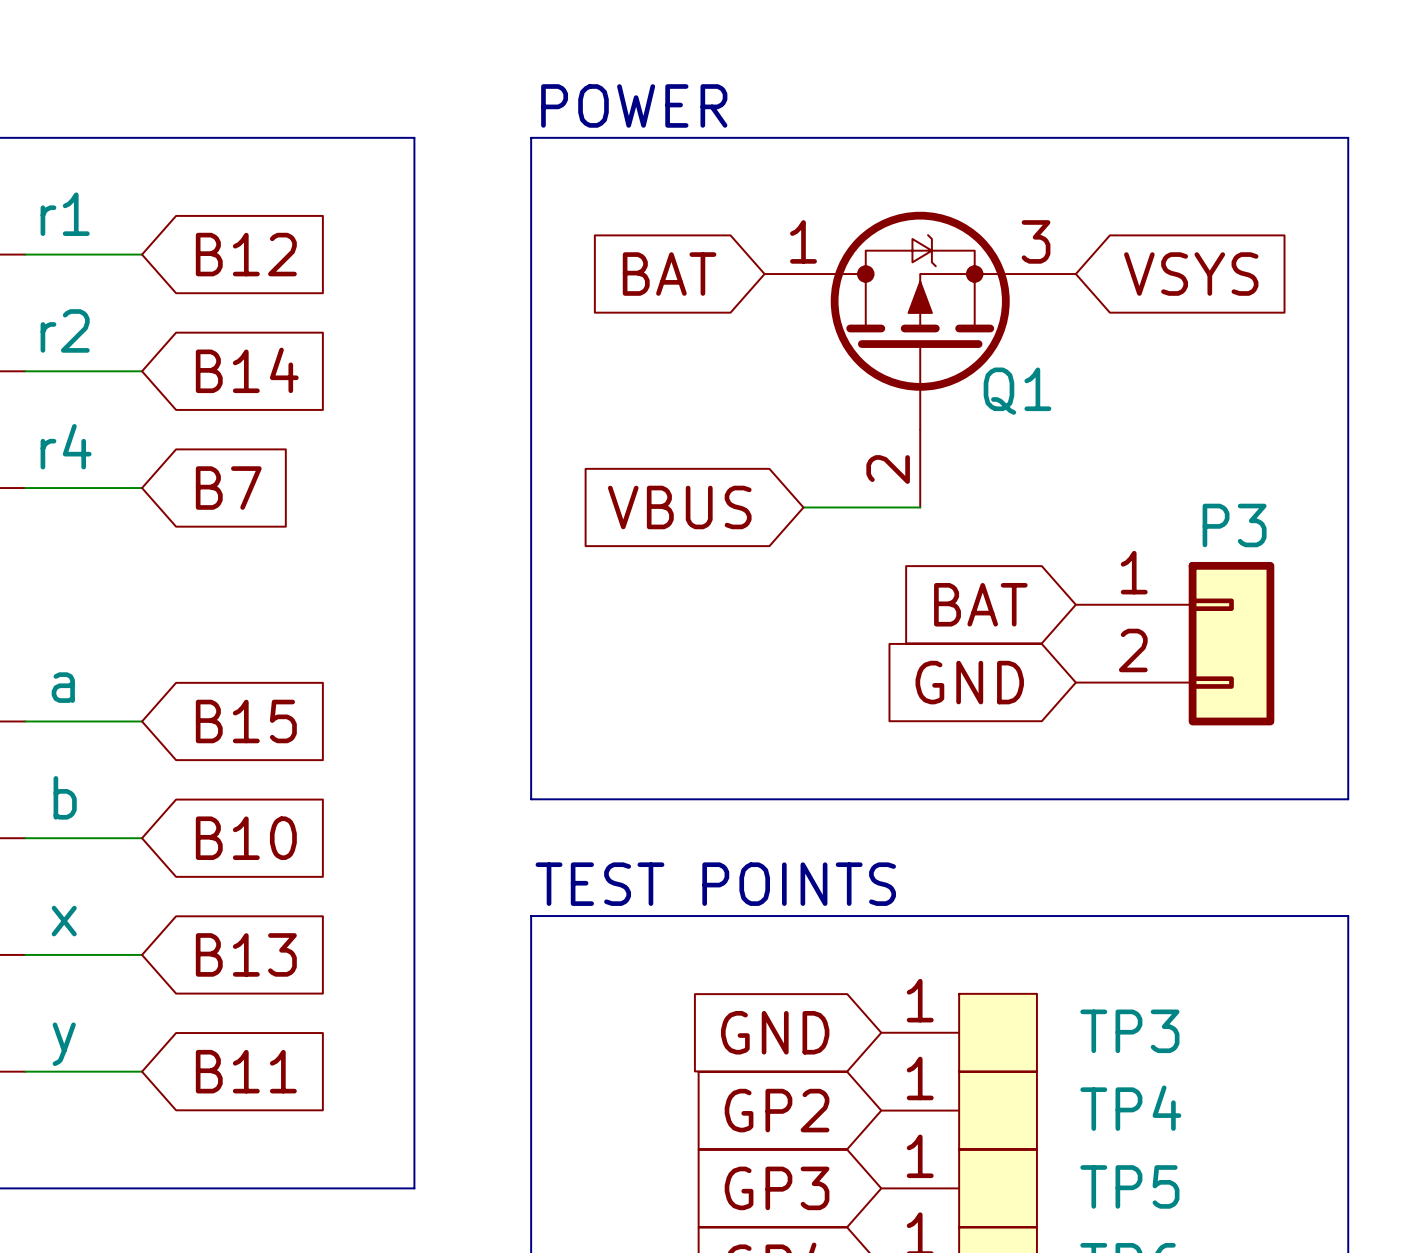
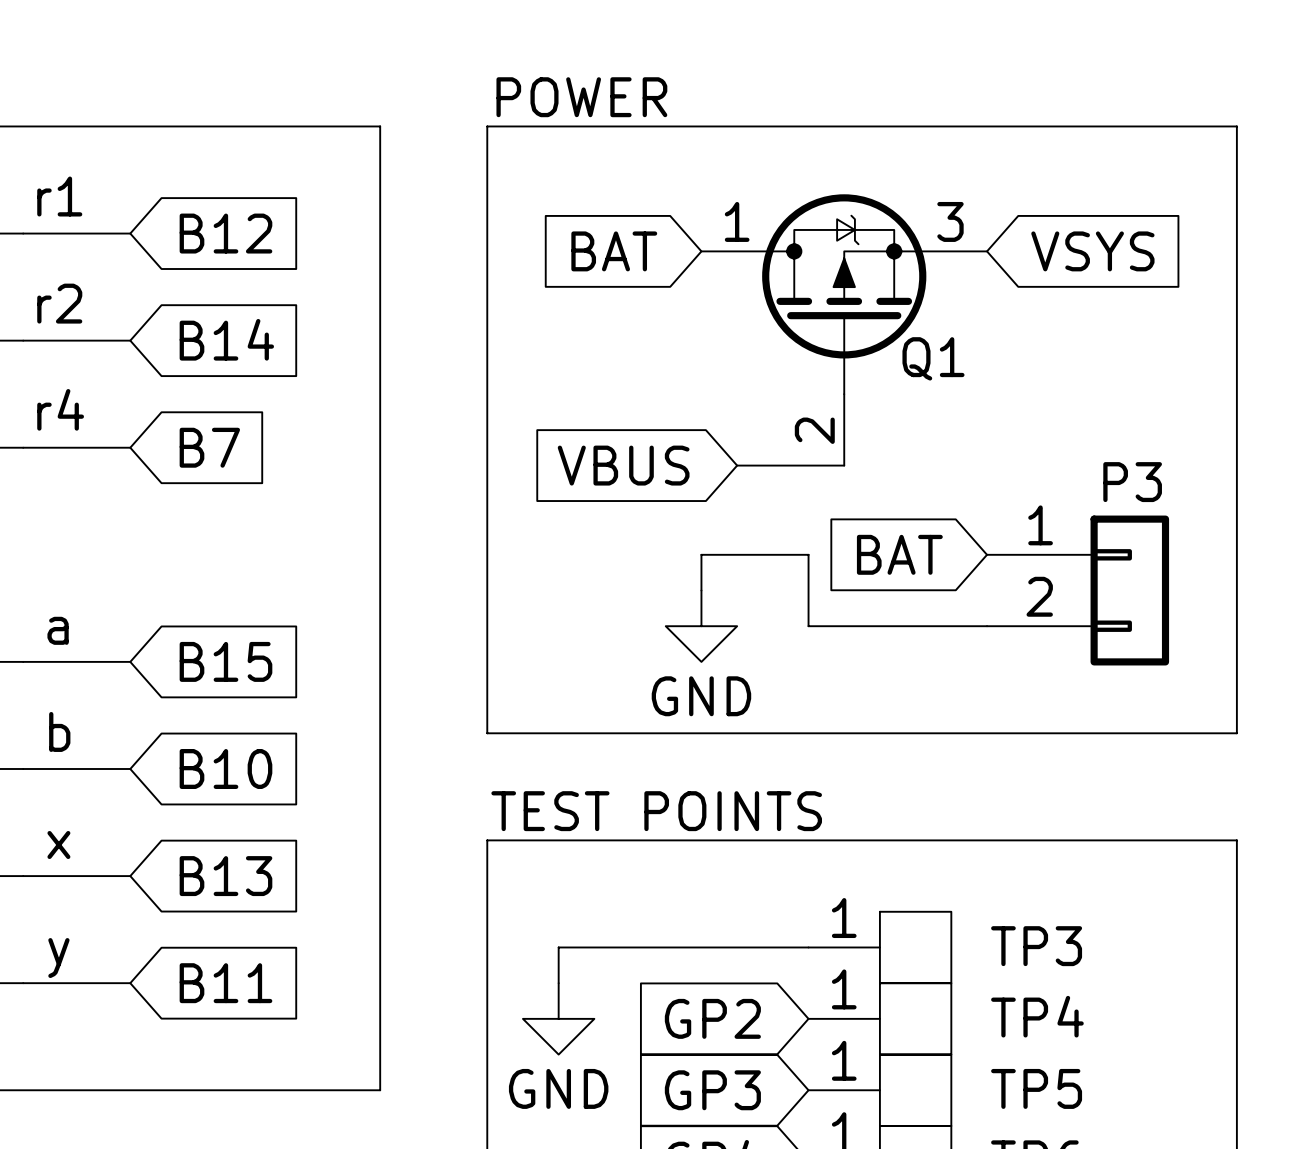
wire: none -> (701, 590) (701, 554) (808, 554) (808, 626) (987, 626)
power symbol: none -> GND (701, 626)
global label: GND (969, 682) -> none
global label: GND (775, 1032) -> none
wire: none -> (808, 947) (558, 947) (558, 983)
power symbol: none -> GND (558, 1018)

